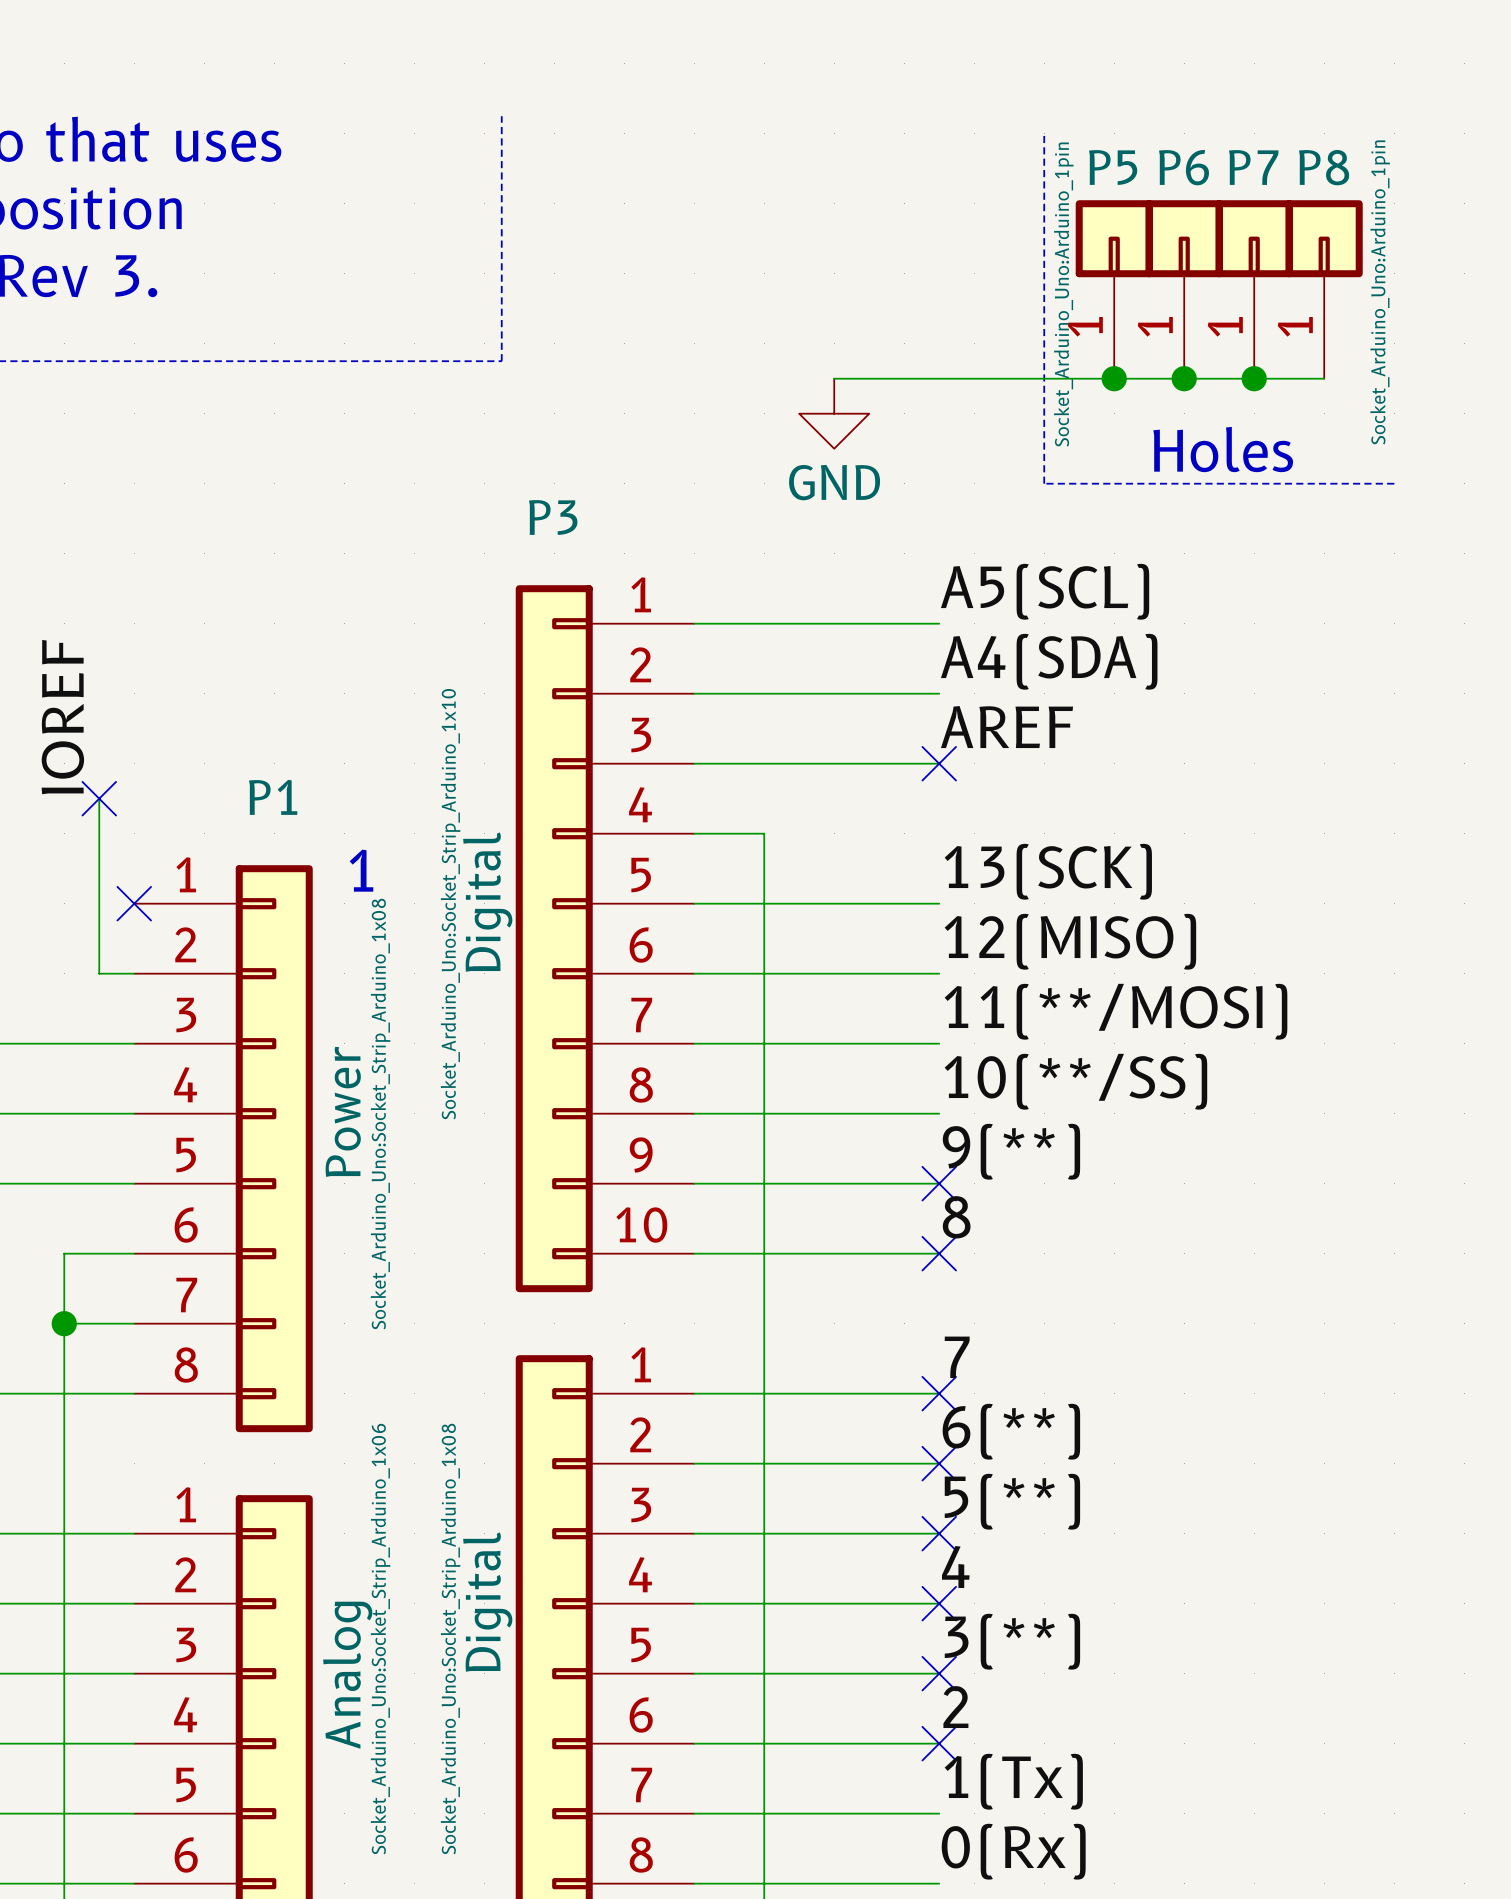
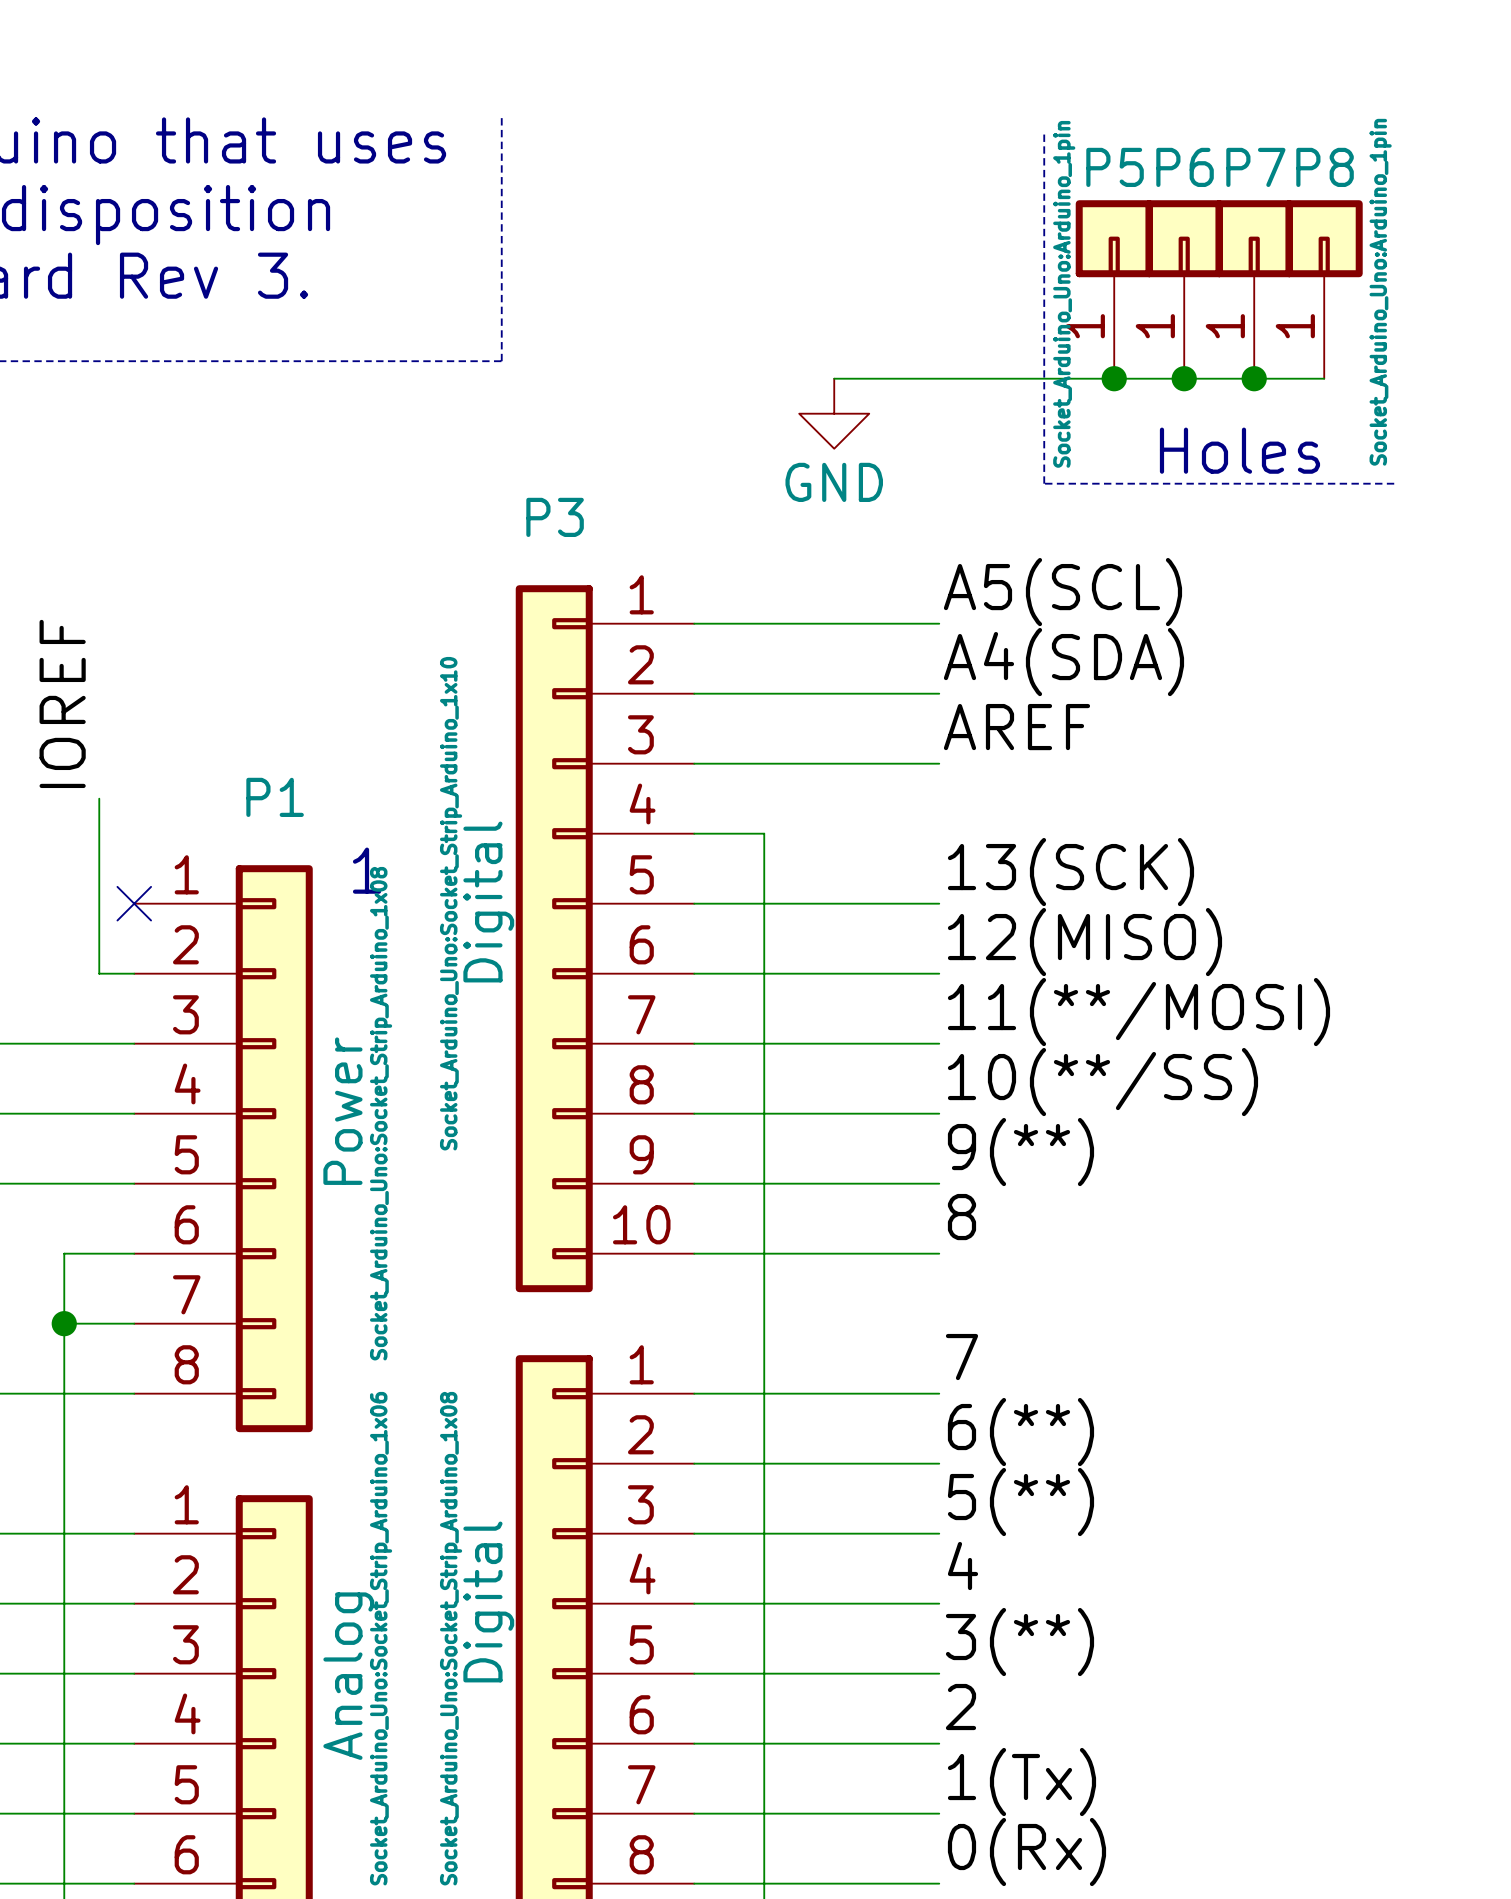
no-connect mark: (939, 763) -> none
no-connect mark: (99, 798) -> none
no-connect mark: (939, 1183) -> none
no-connect mark: (939, 1253) -> none
no-connect mark: (939, 1393) -> none
no-connect mark: (939, 1463) -> none
no-connect mark: (939, 1533) -> none
no-connect mark: (939, 1603) -> none
no-connect mark: (939, 1673) -> none
no-connect mark: (939, 1743) -> none

